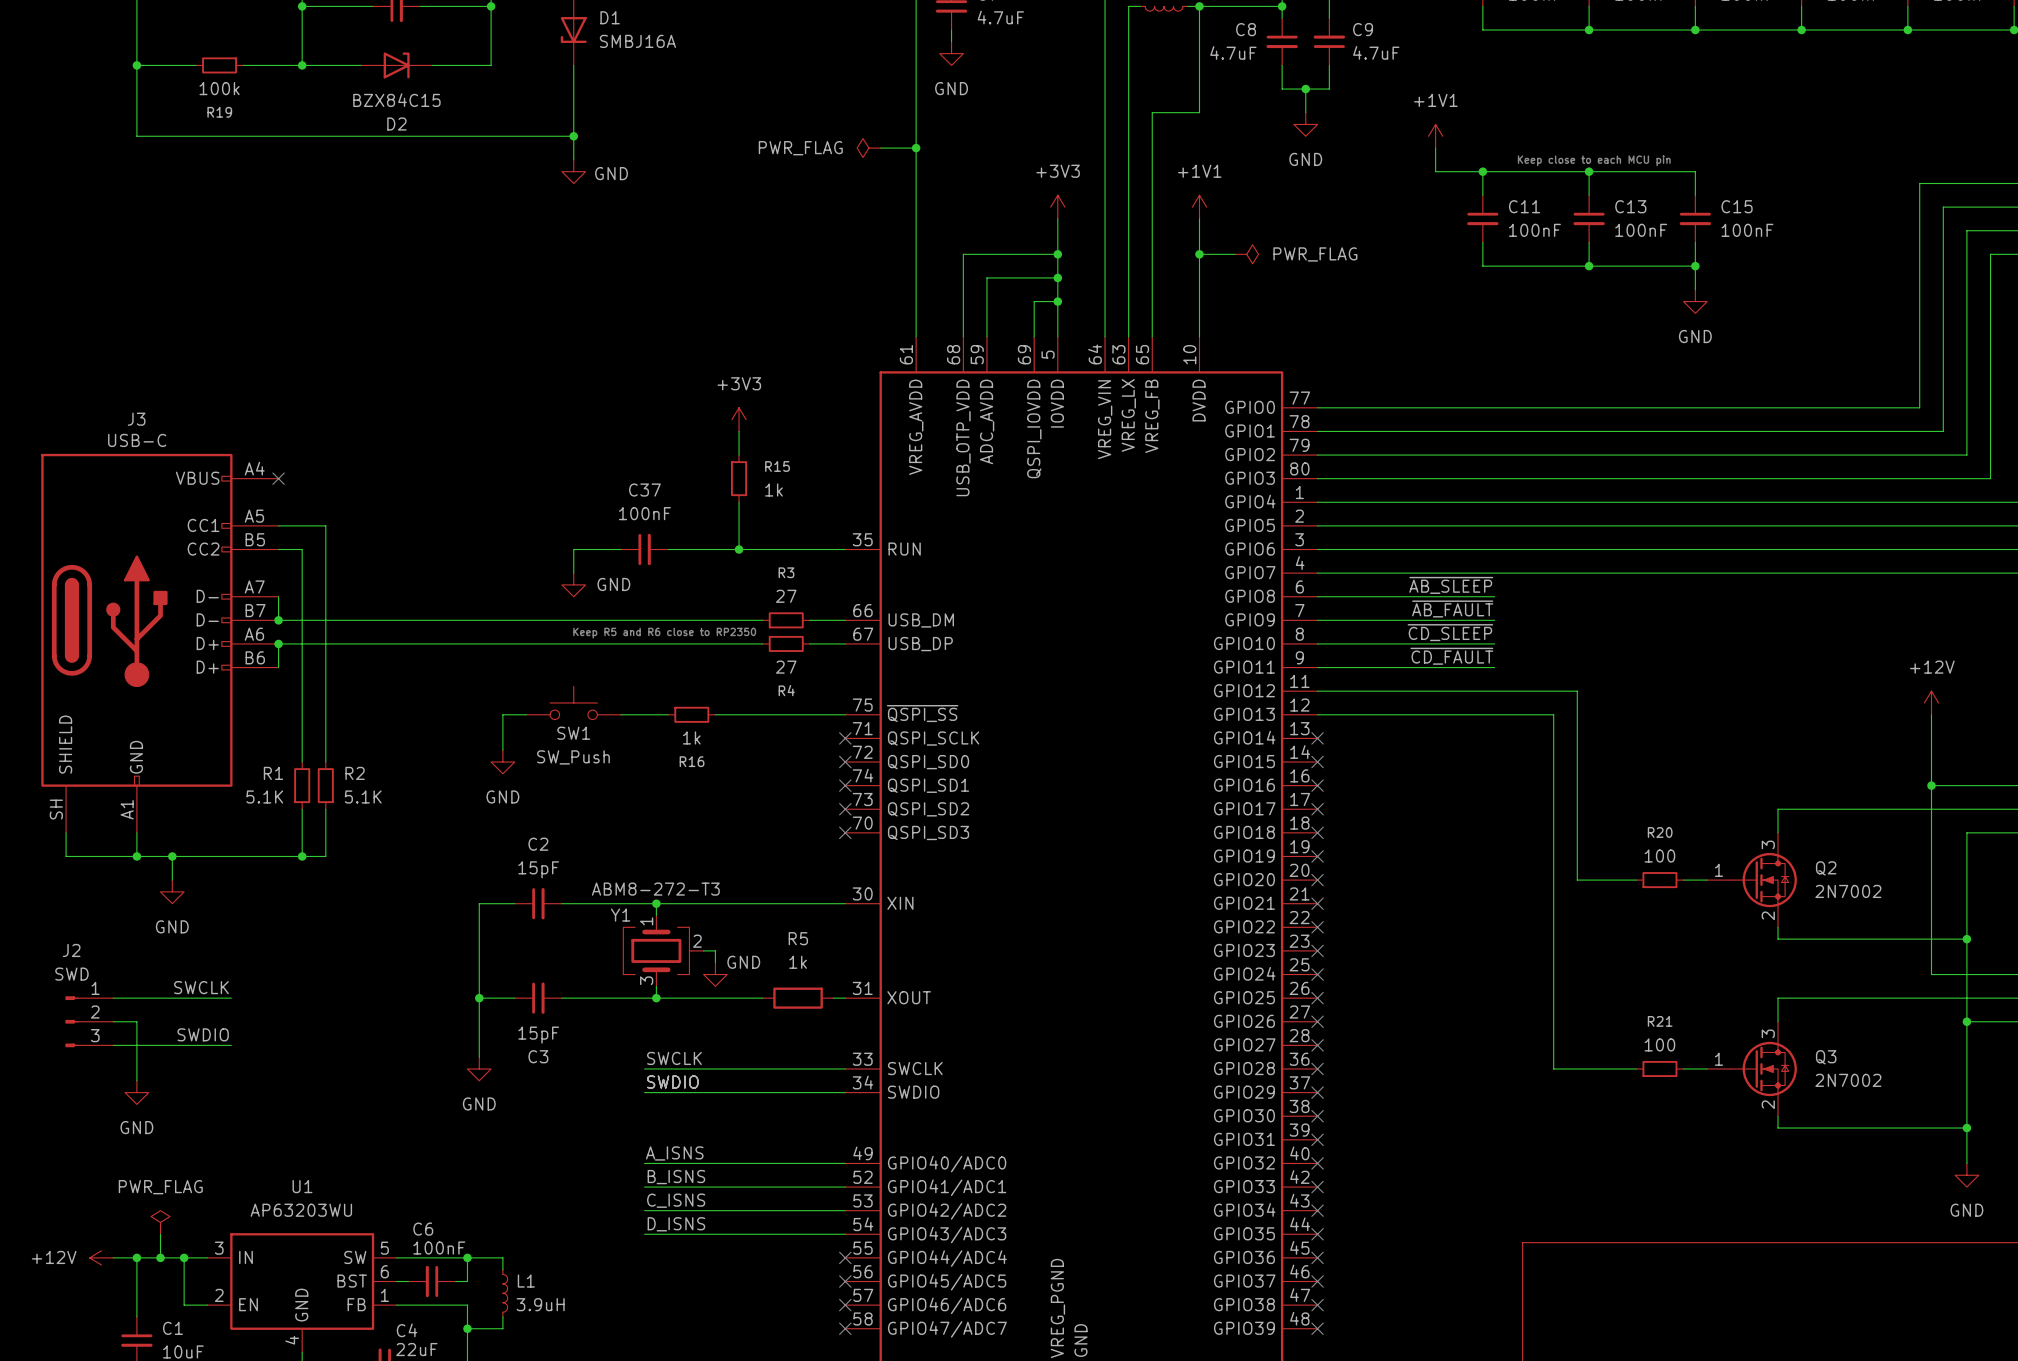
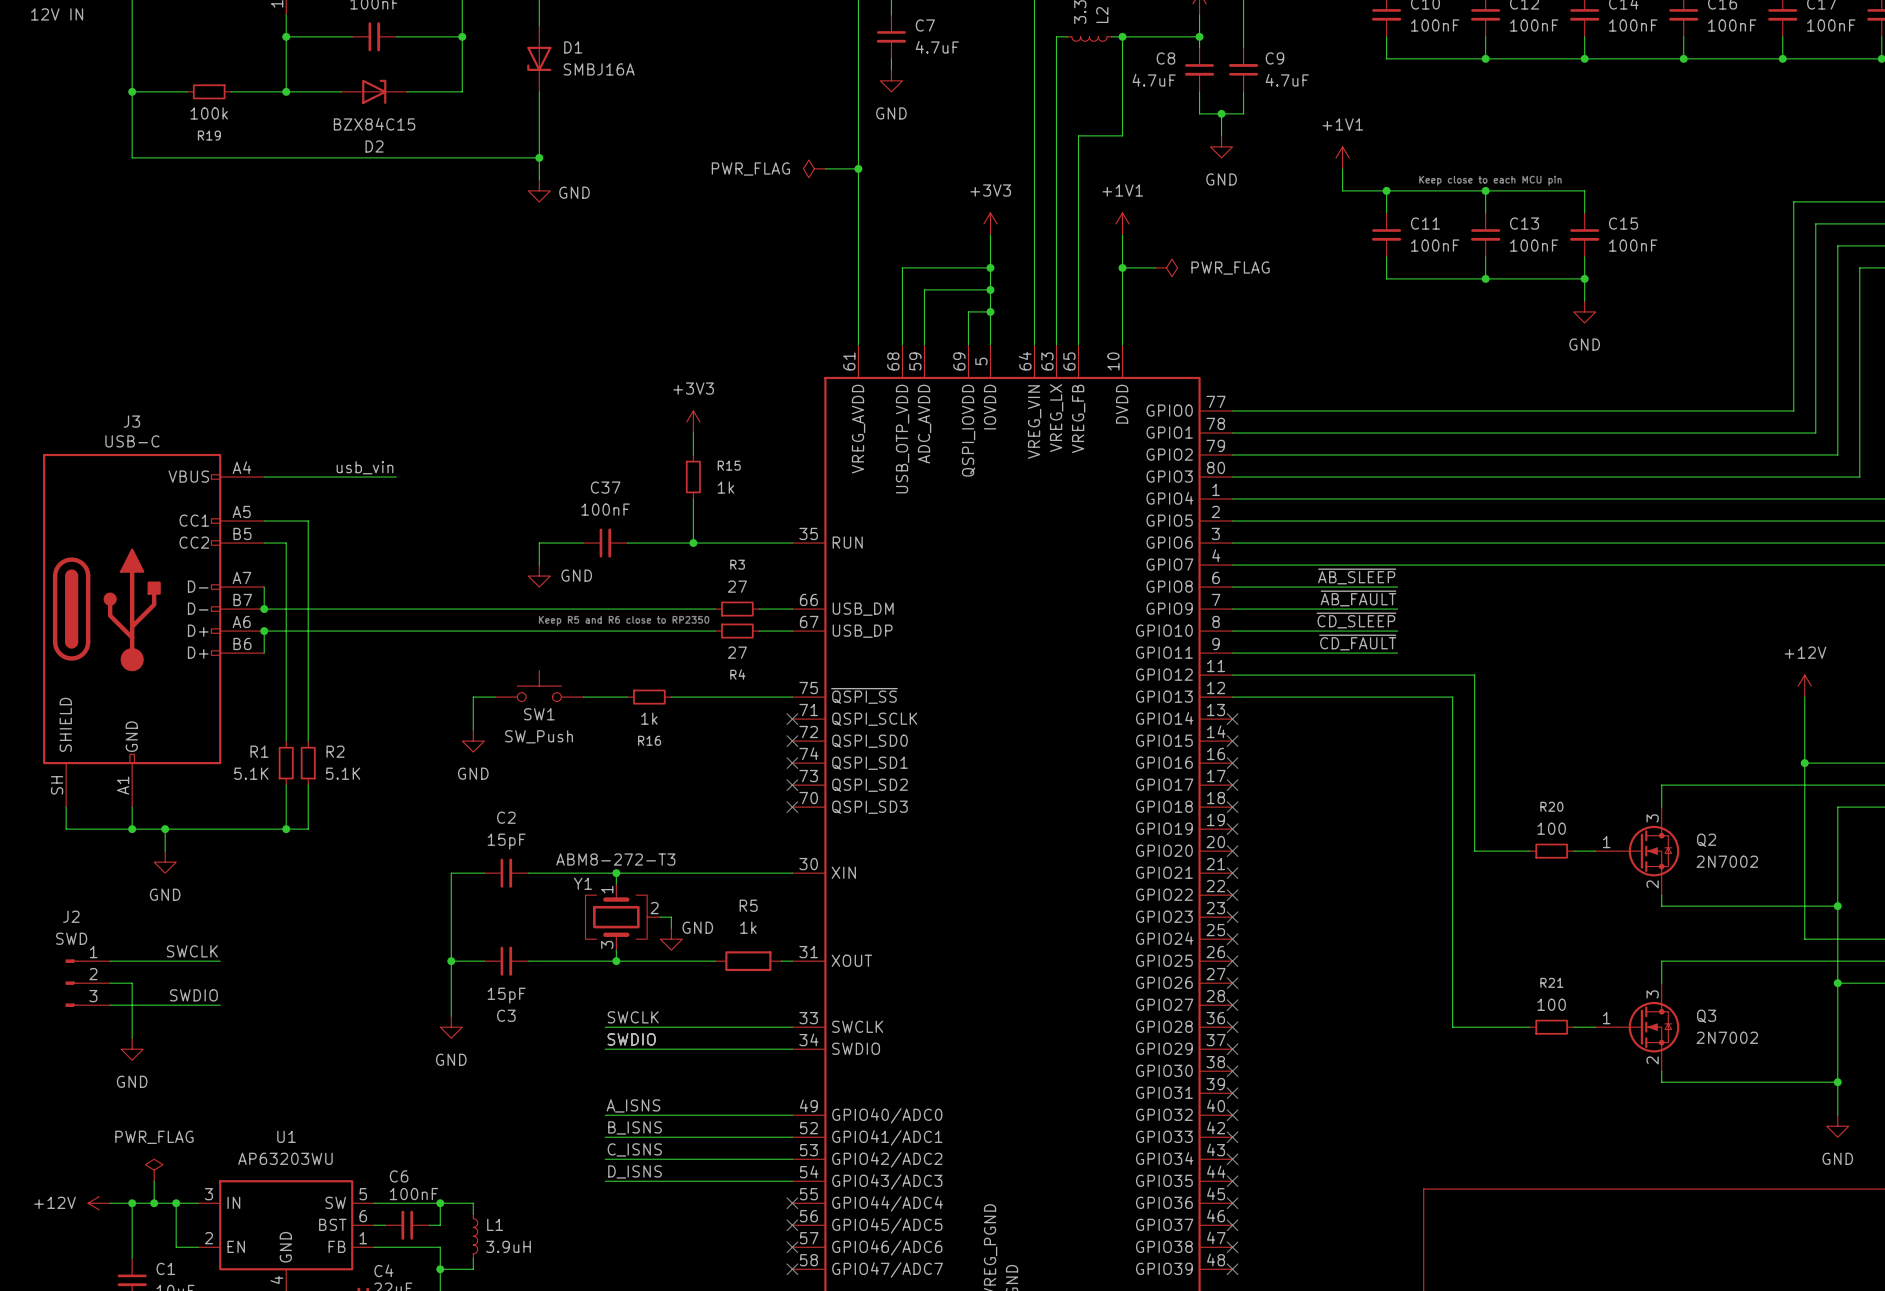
label: none -> usb_vin (365, 467)
wire: none -> (264, 477) (396, 477)
no-connect mark: (278, 478) -> none

